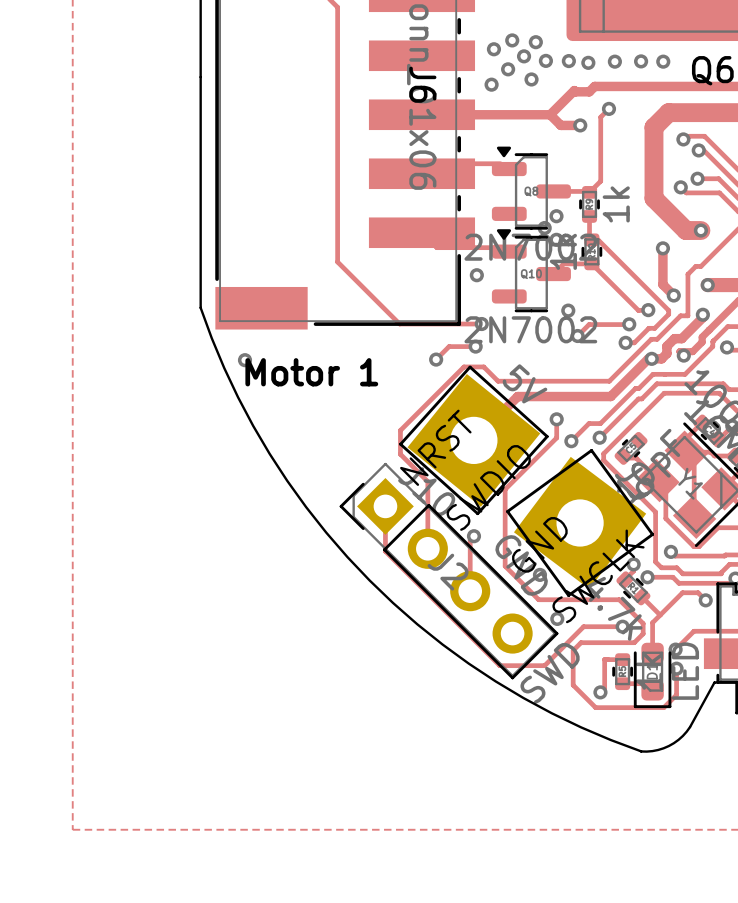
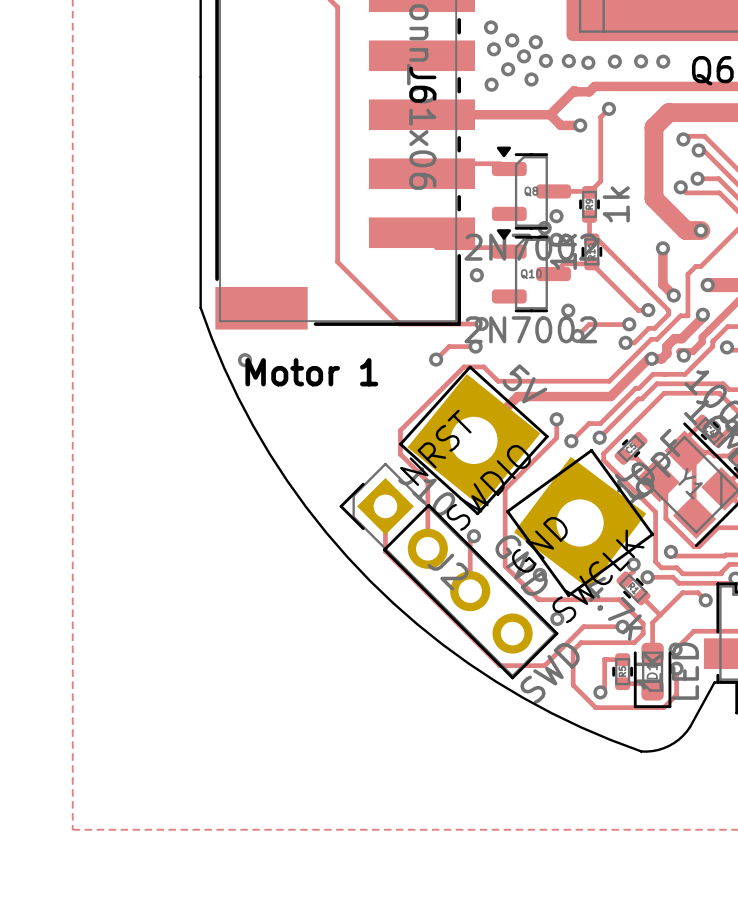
via: none -> (491, 27)

